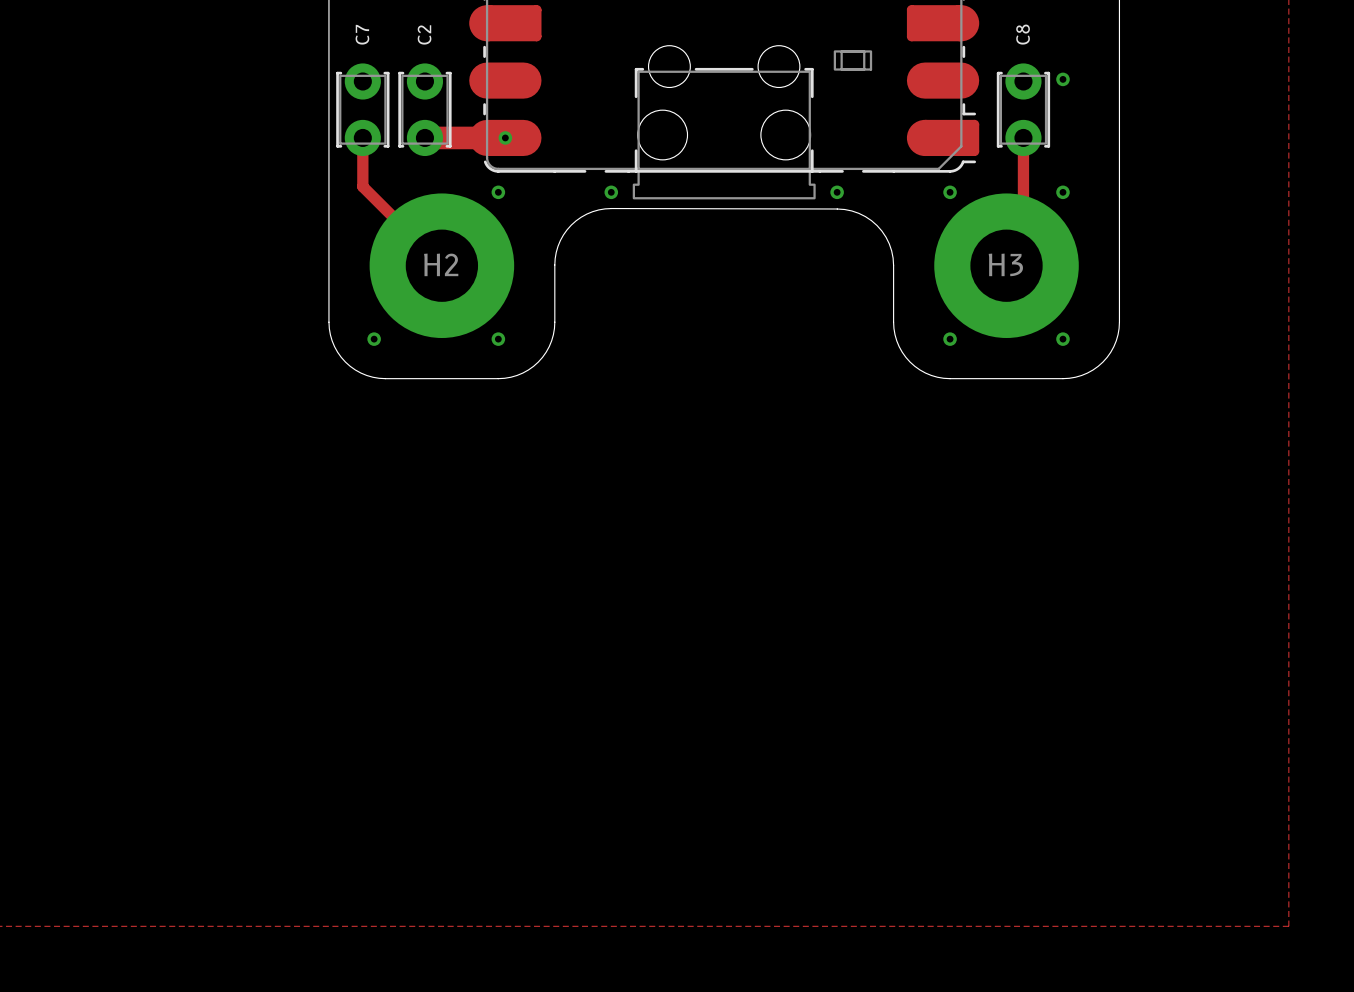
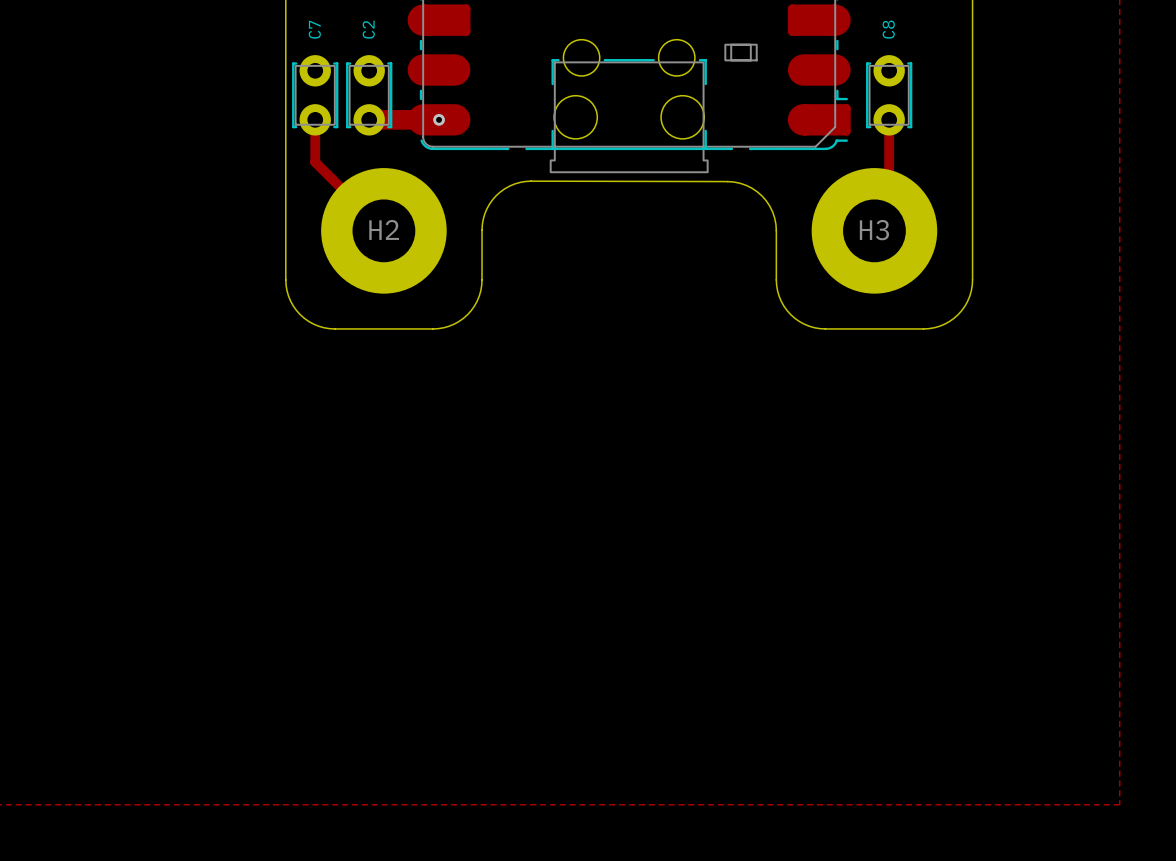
via: (1062, 79) -> none
via: (498, 192) -> none
via: (611, 192) -> none
via: (837, 192) -> none
via: (950, 192) -> none
via: (1062, 192) -> none
via: (374, 339) -> none
via: (498, 339) -> none
via: (950, 339) -> none
via: (1062, 339) -> none

